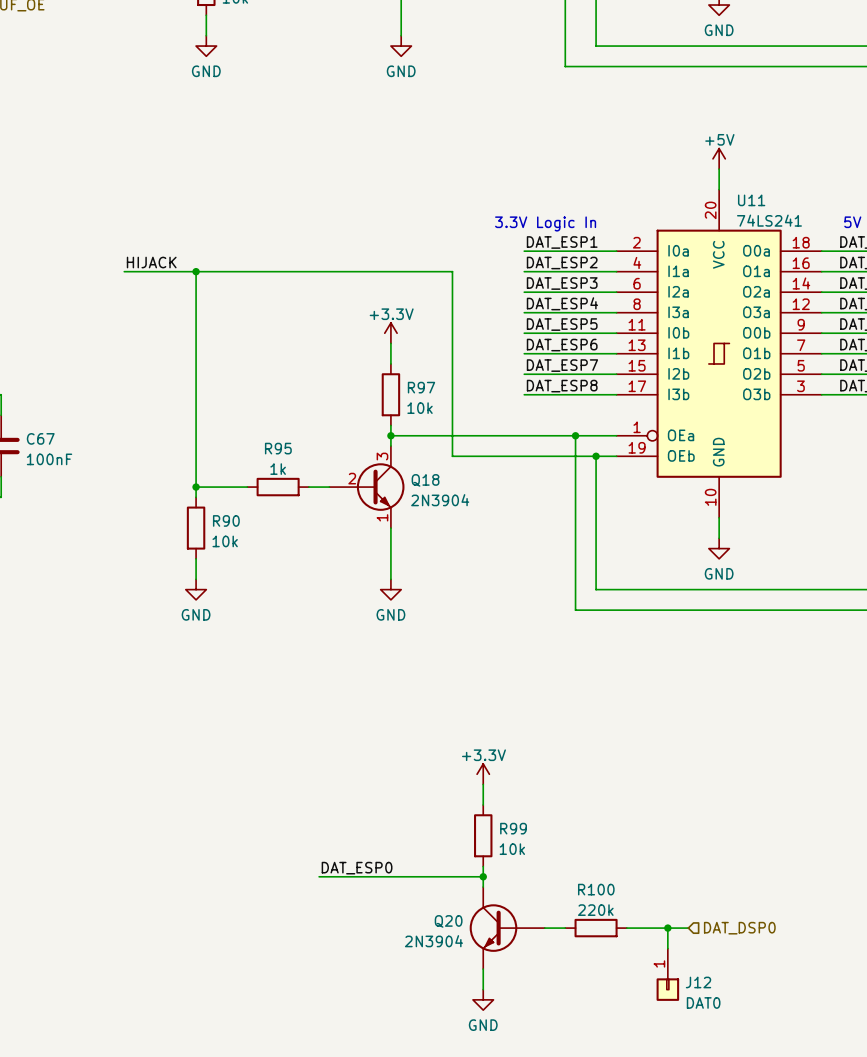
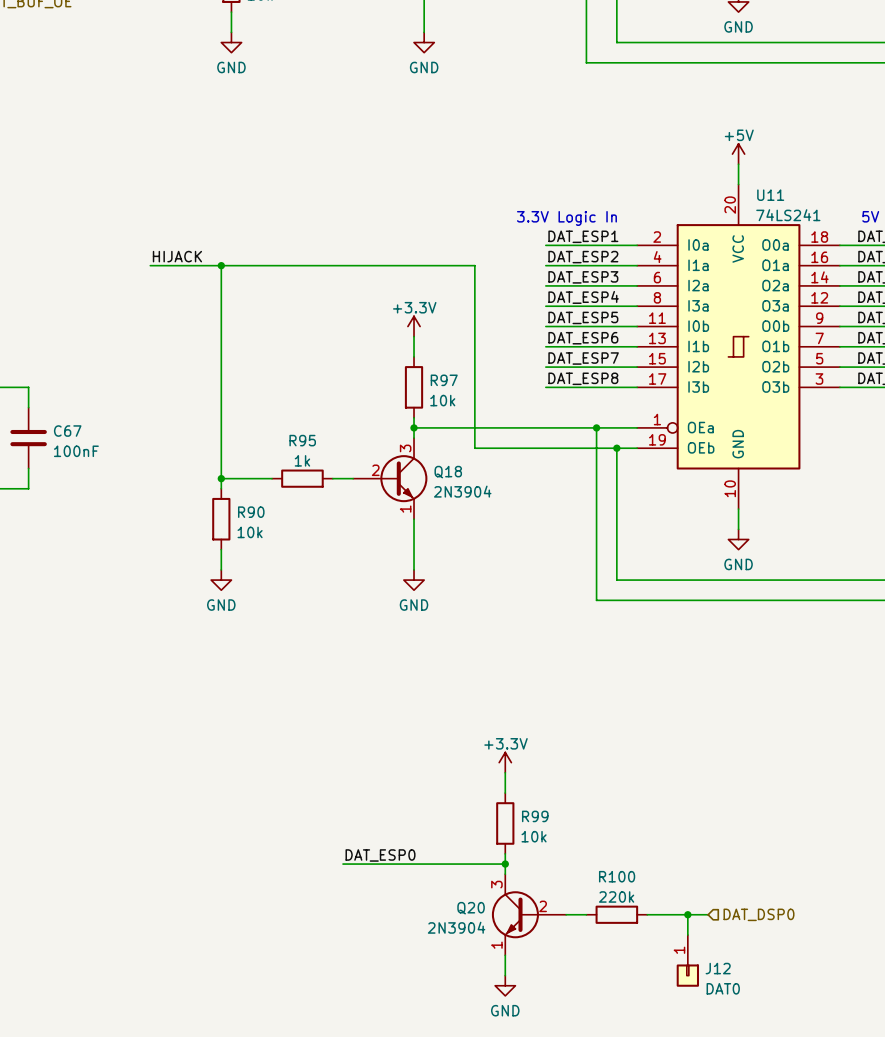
Q20 pin number: none -> 3 (496, 884)
Q20 pin number: none -> 2 (543, 906)
Q20 pin number: none -> 1 (496, 945)

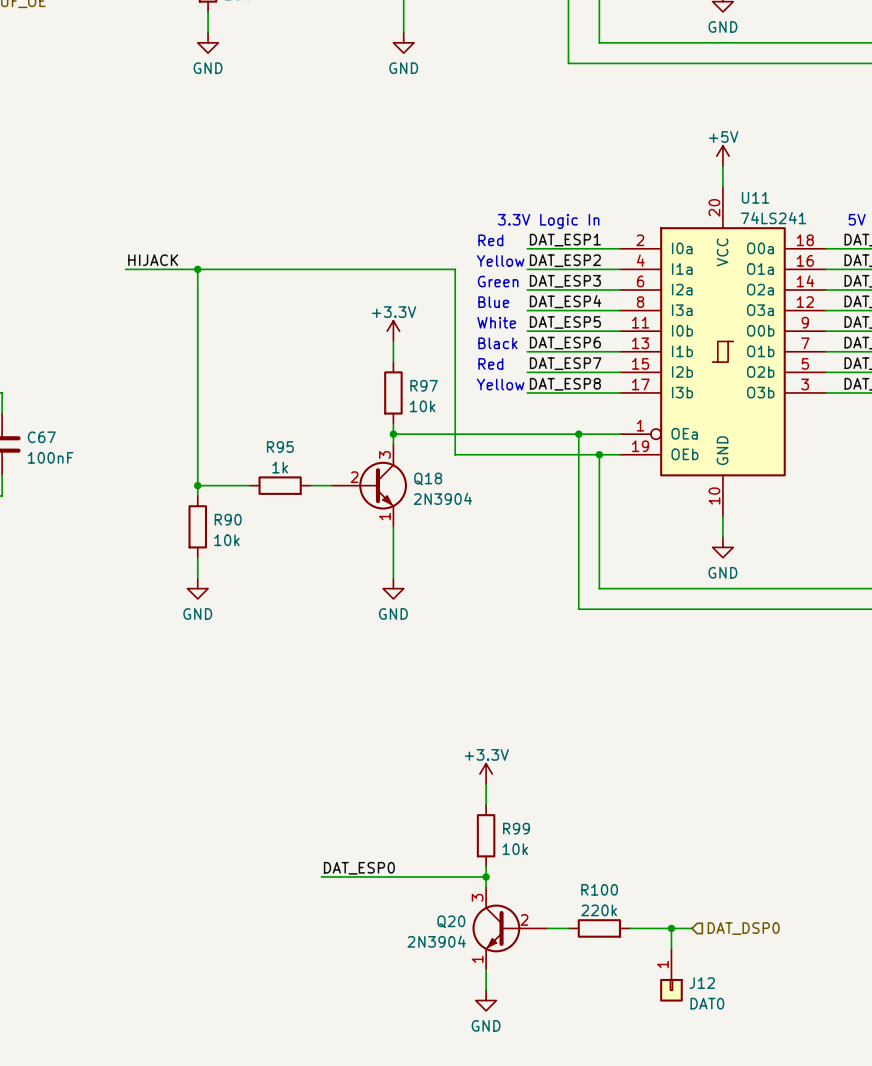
text: none -> Red (490, 240)
text: none -> Yellow (500, 260)
text: none -> Green (498, 281)
text: none -> Blue (493, 302)
text: none -> White (496, 322)
text: none -> Black (497, 343)
text: none -> Red (490, 363)
text: none -> Yellow (500, 384)

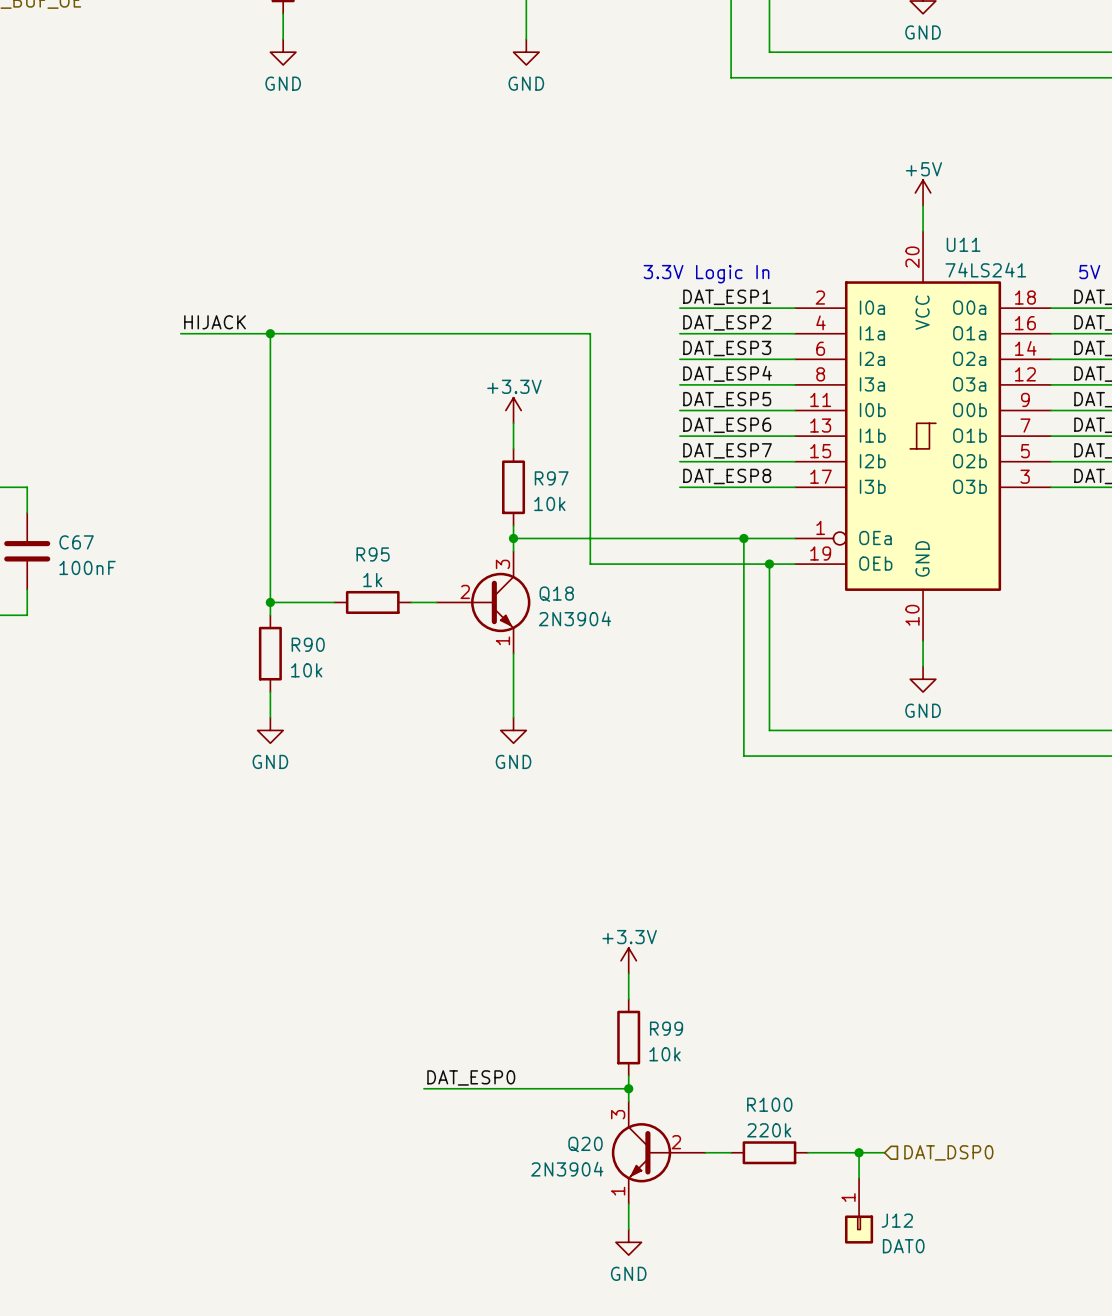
text: Red (490, 240) -> none
text: Yellow (500, 260) -> none
text: Green (498, 281) -> none
text: Blue (493, 302) -> none
text: White (496, 322) -> none
text: Black (497, 343) -> none
text: Red (490, 363) -> none
text: Yellow (500, 384) -> none

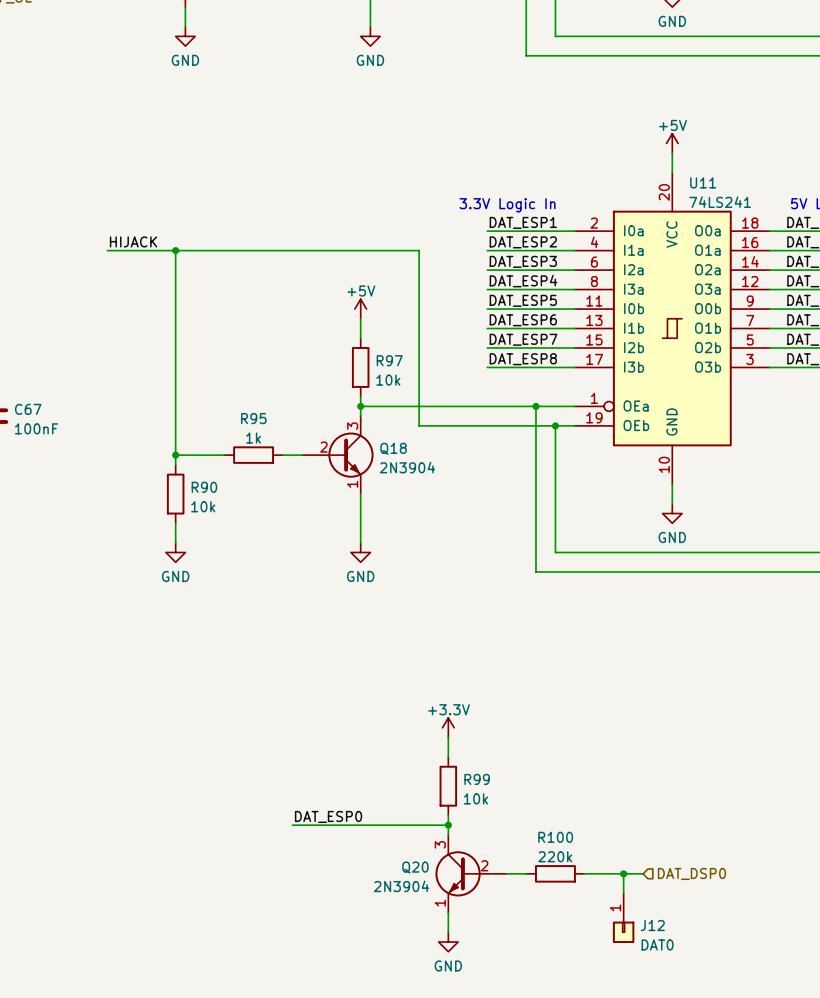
power symbol: +3.3V (513, 410) -> +5V (360, 309)

